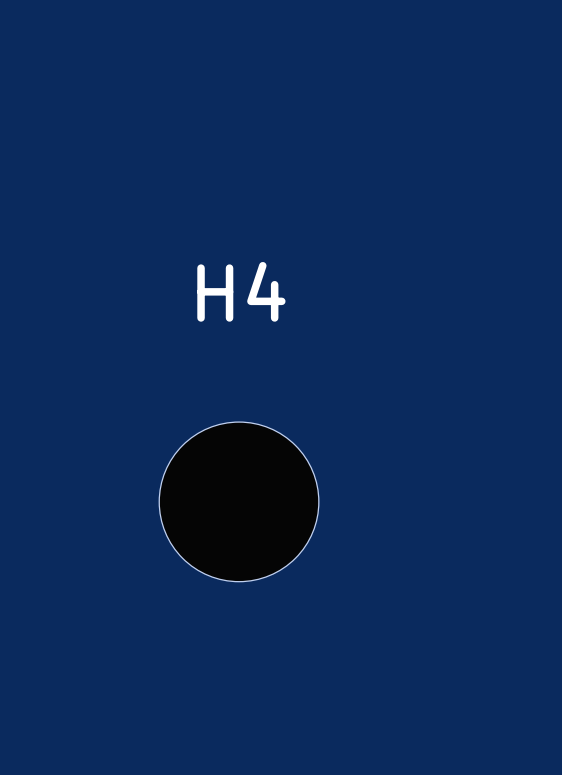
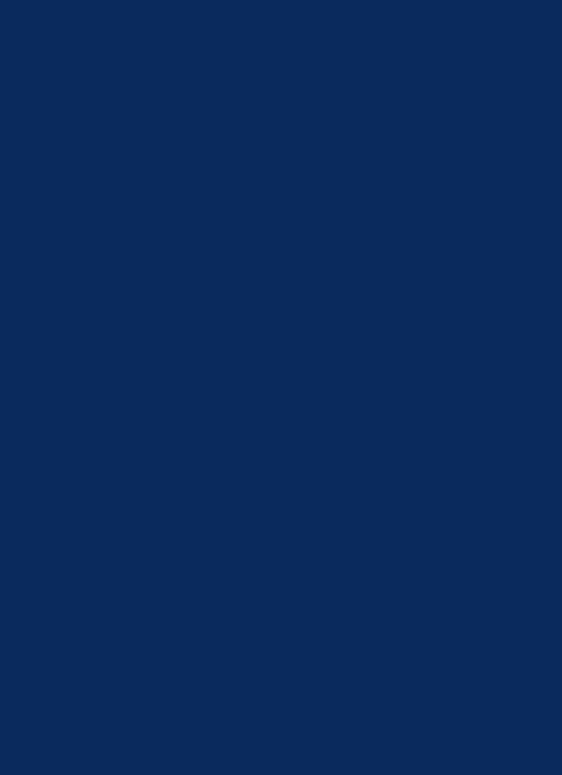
H4: (239, 501) -> none

